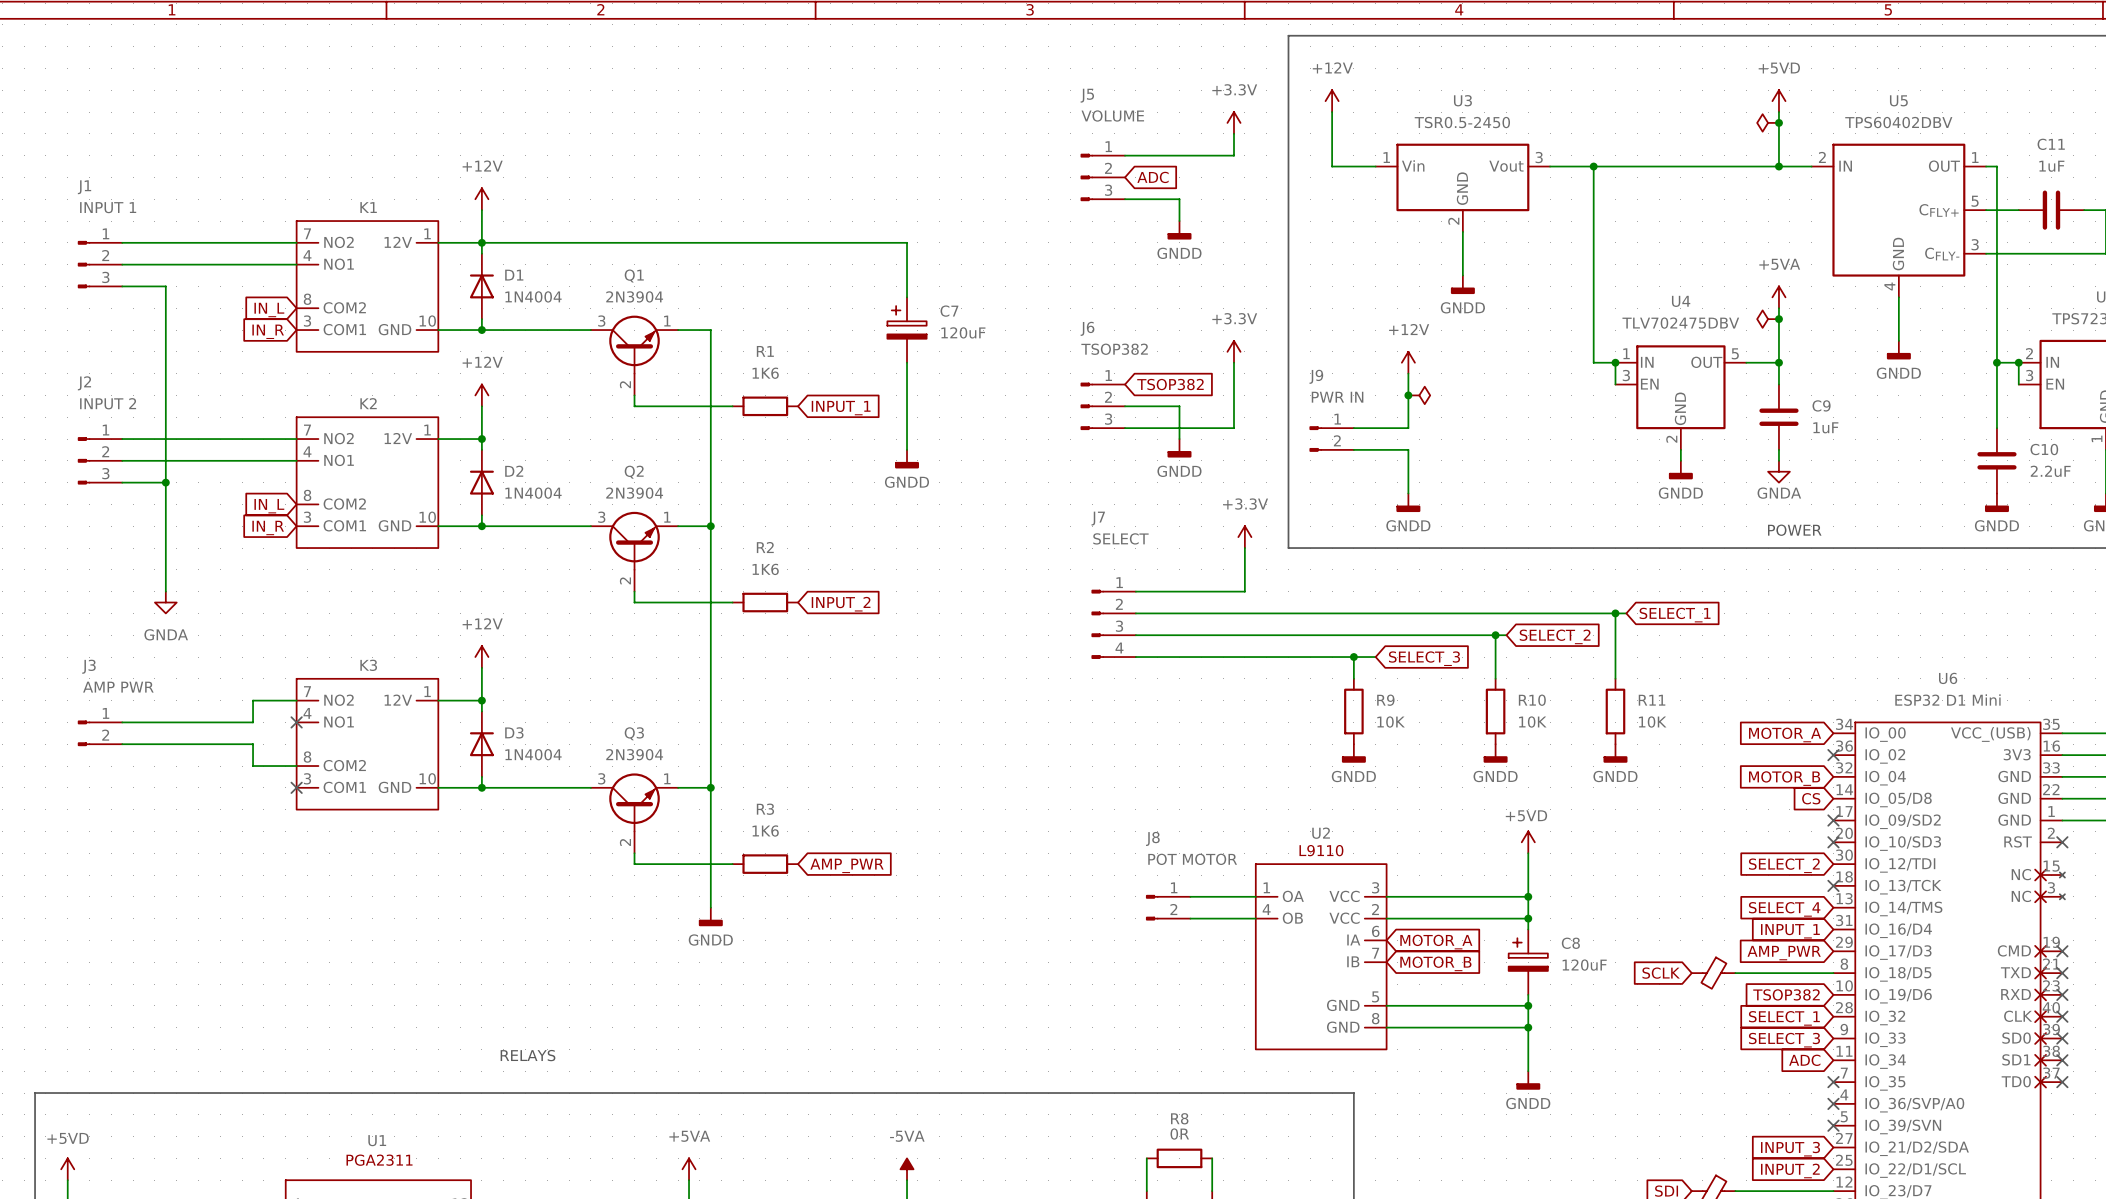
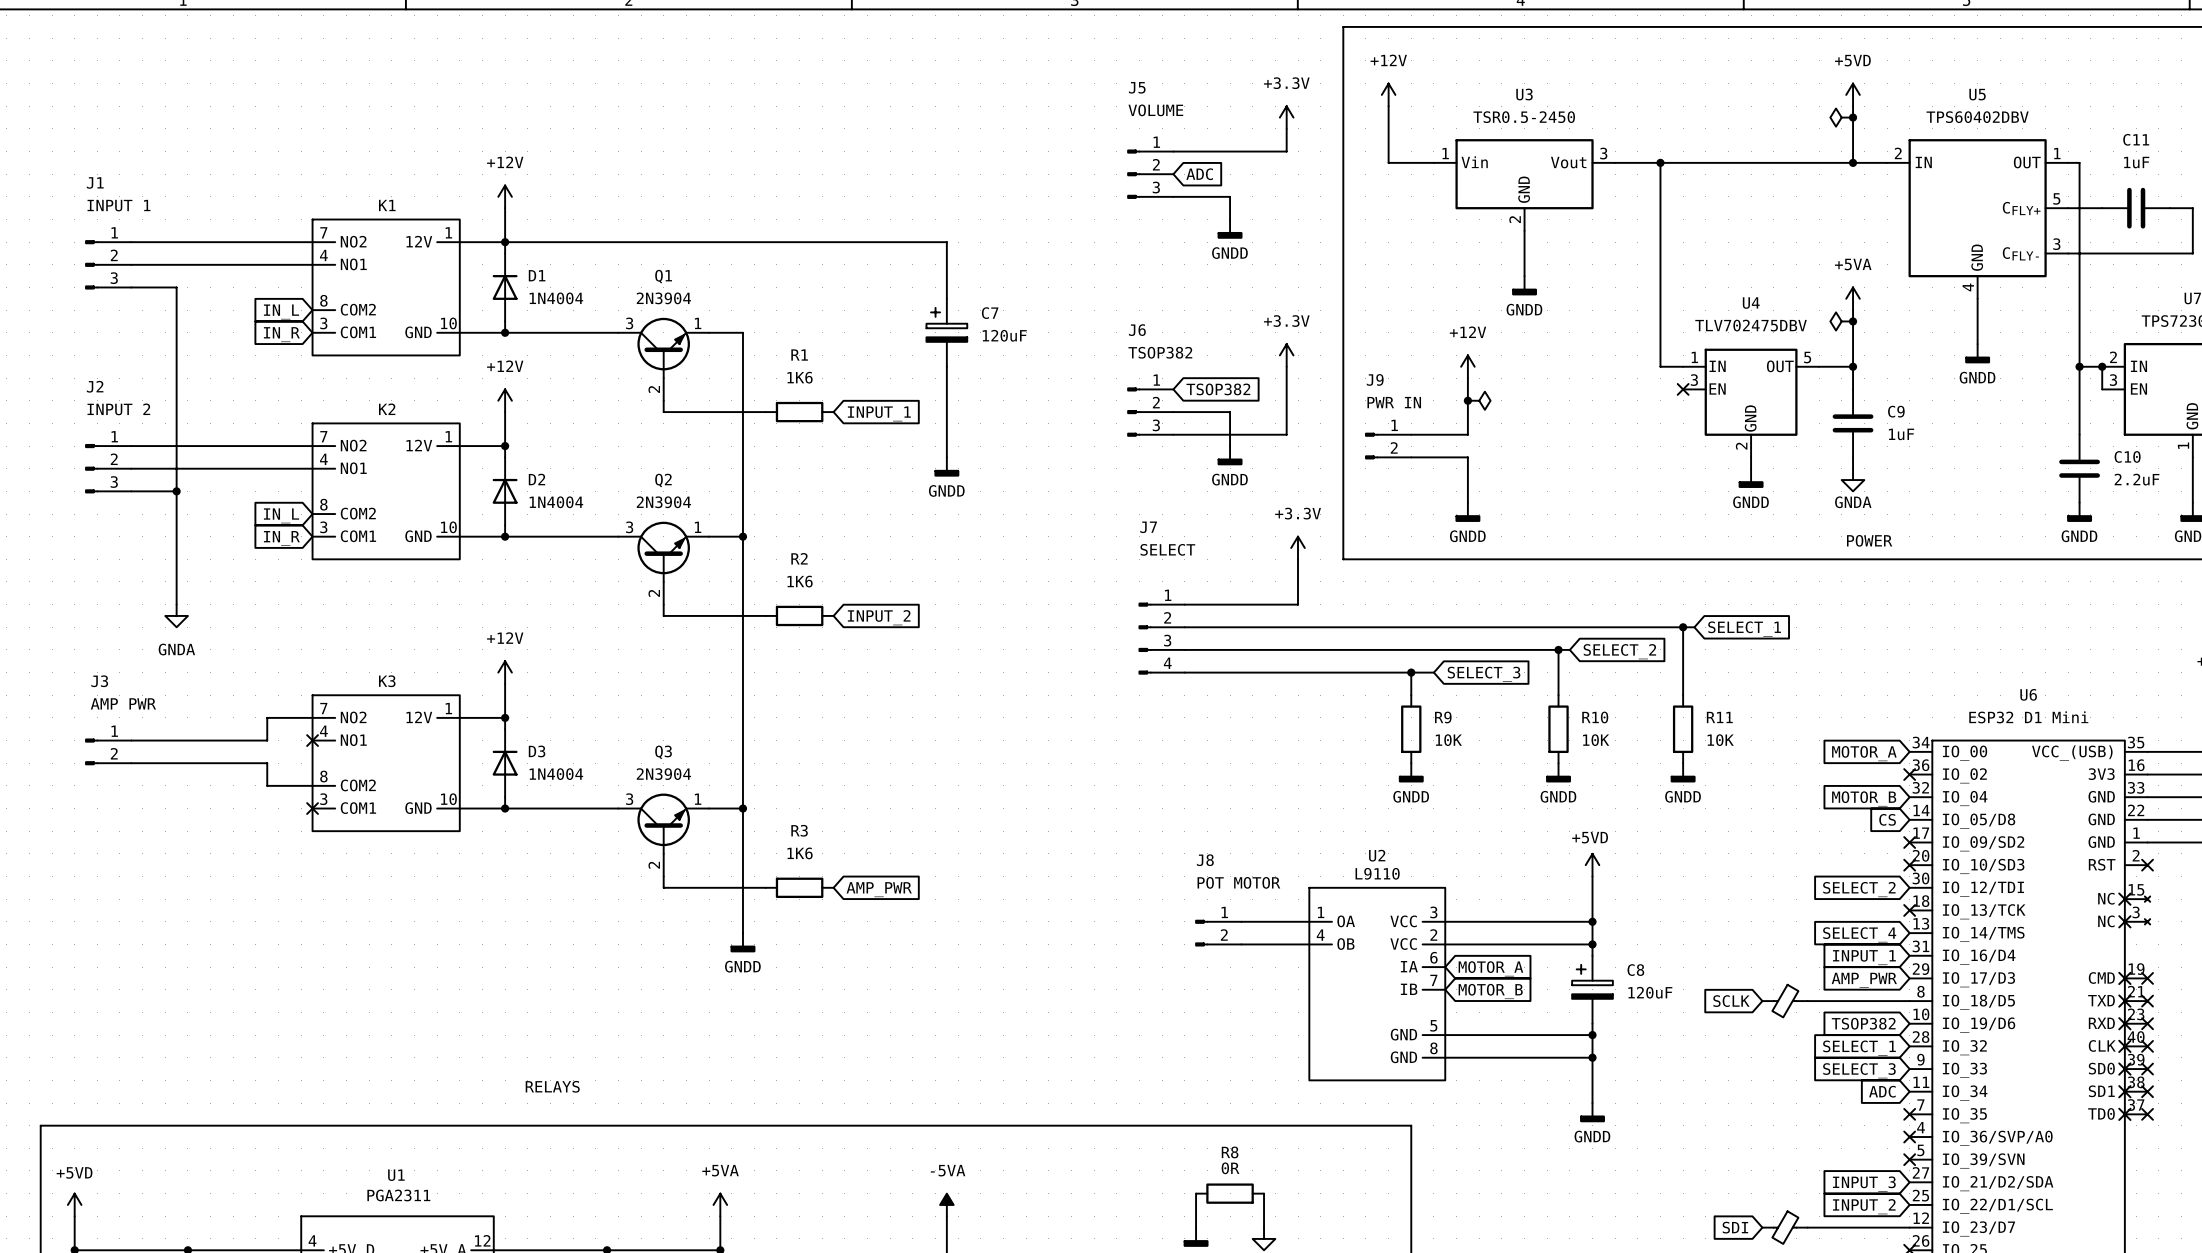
wire: (1615, 362) (1615, 384) -> none
junction: (1615, 362) -> none
no-connect mark: none -> (1683, 389)

